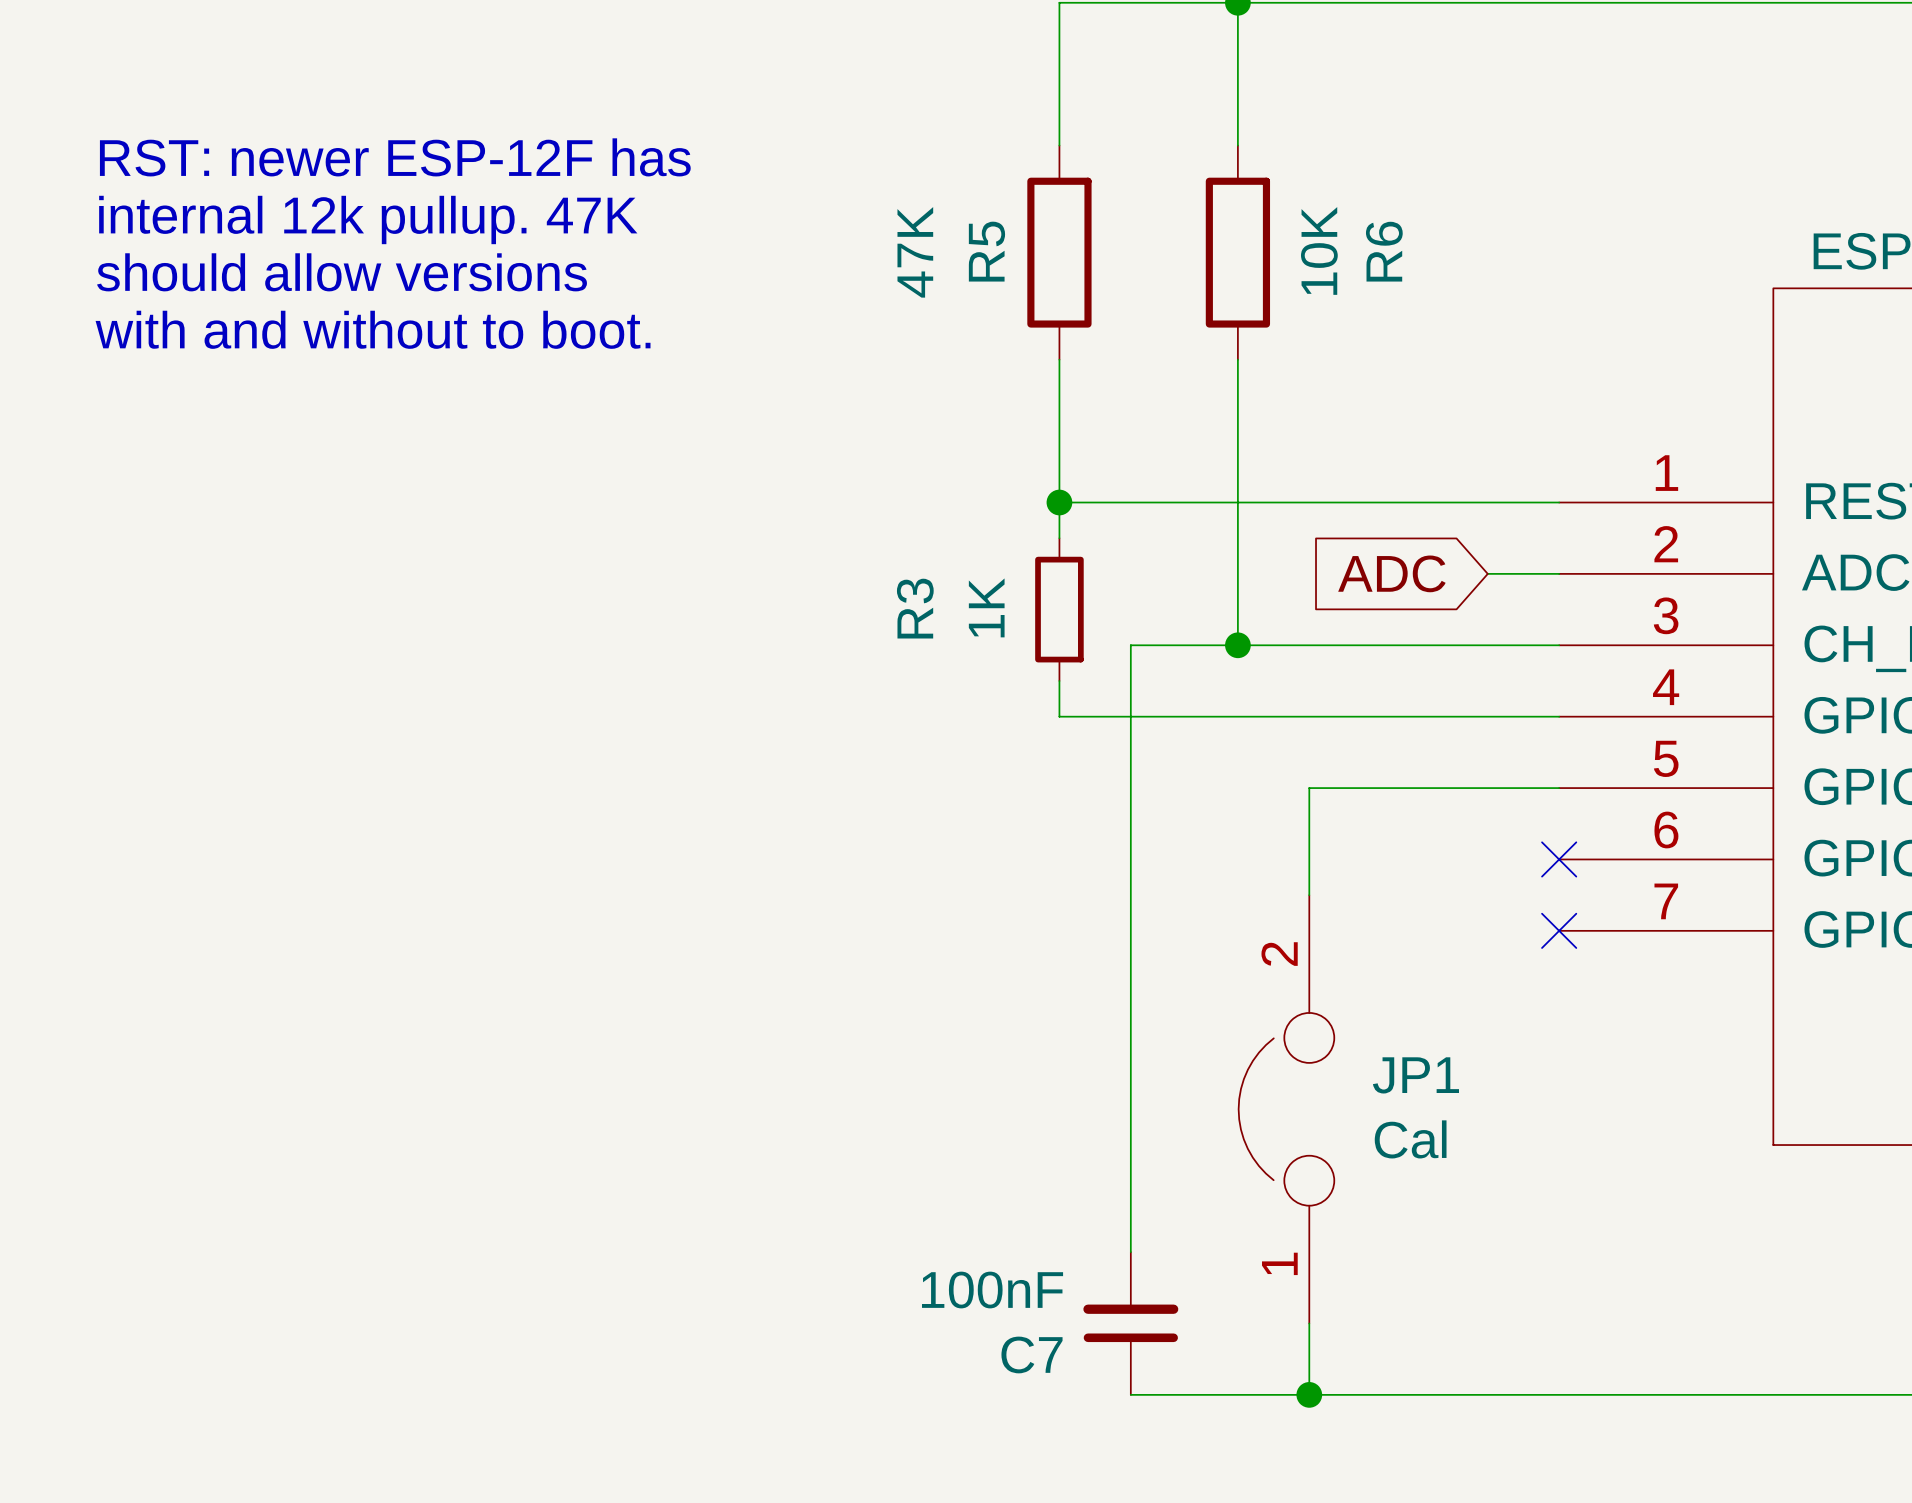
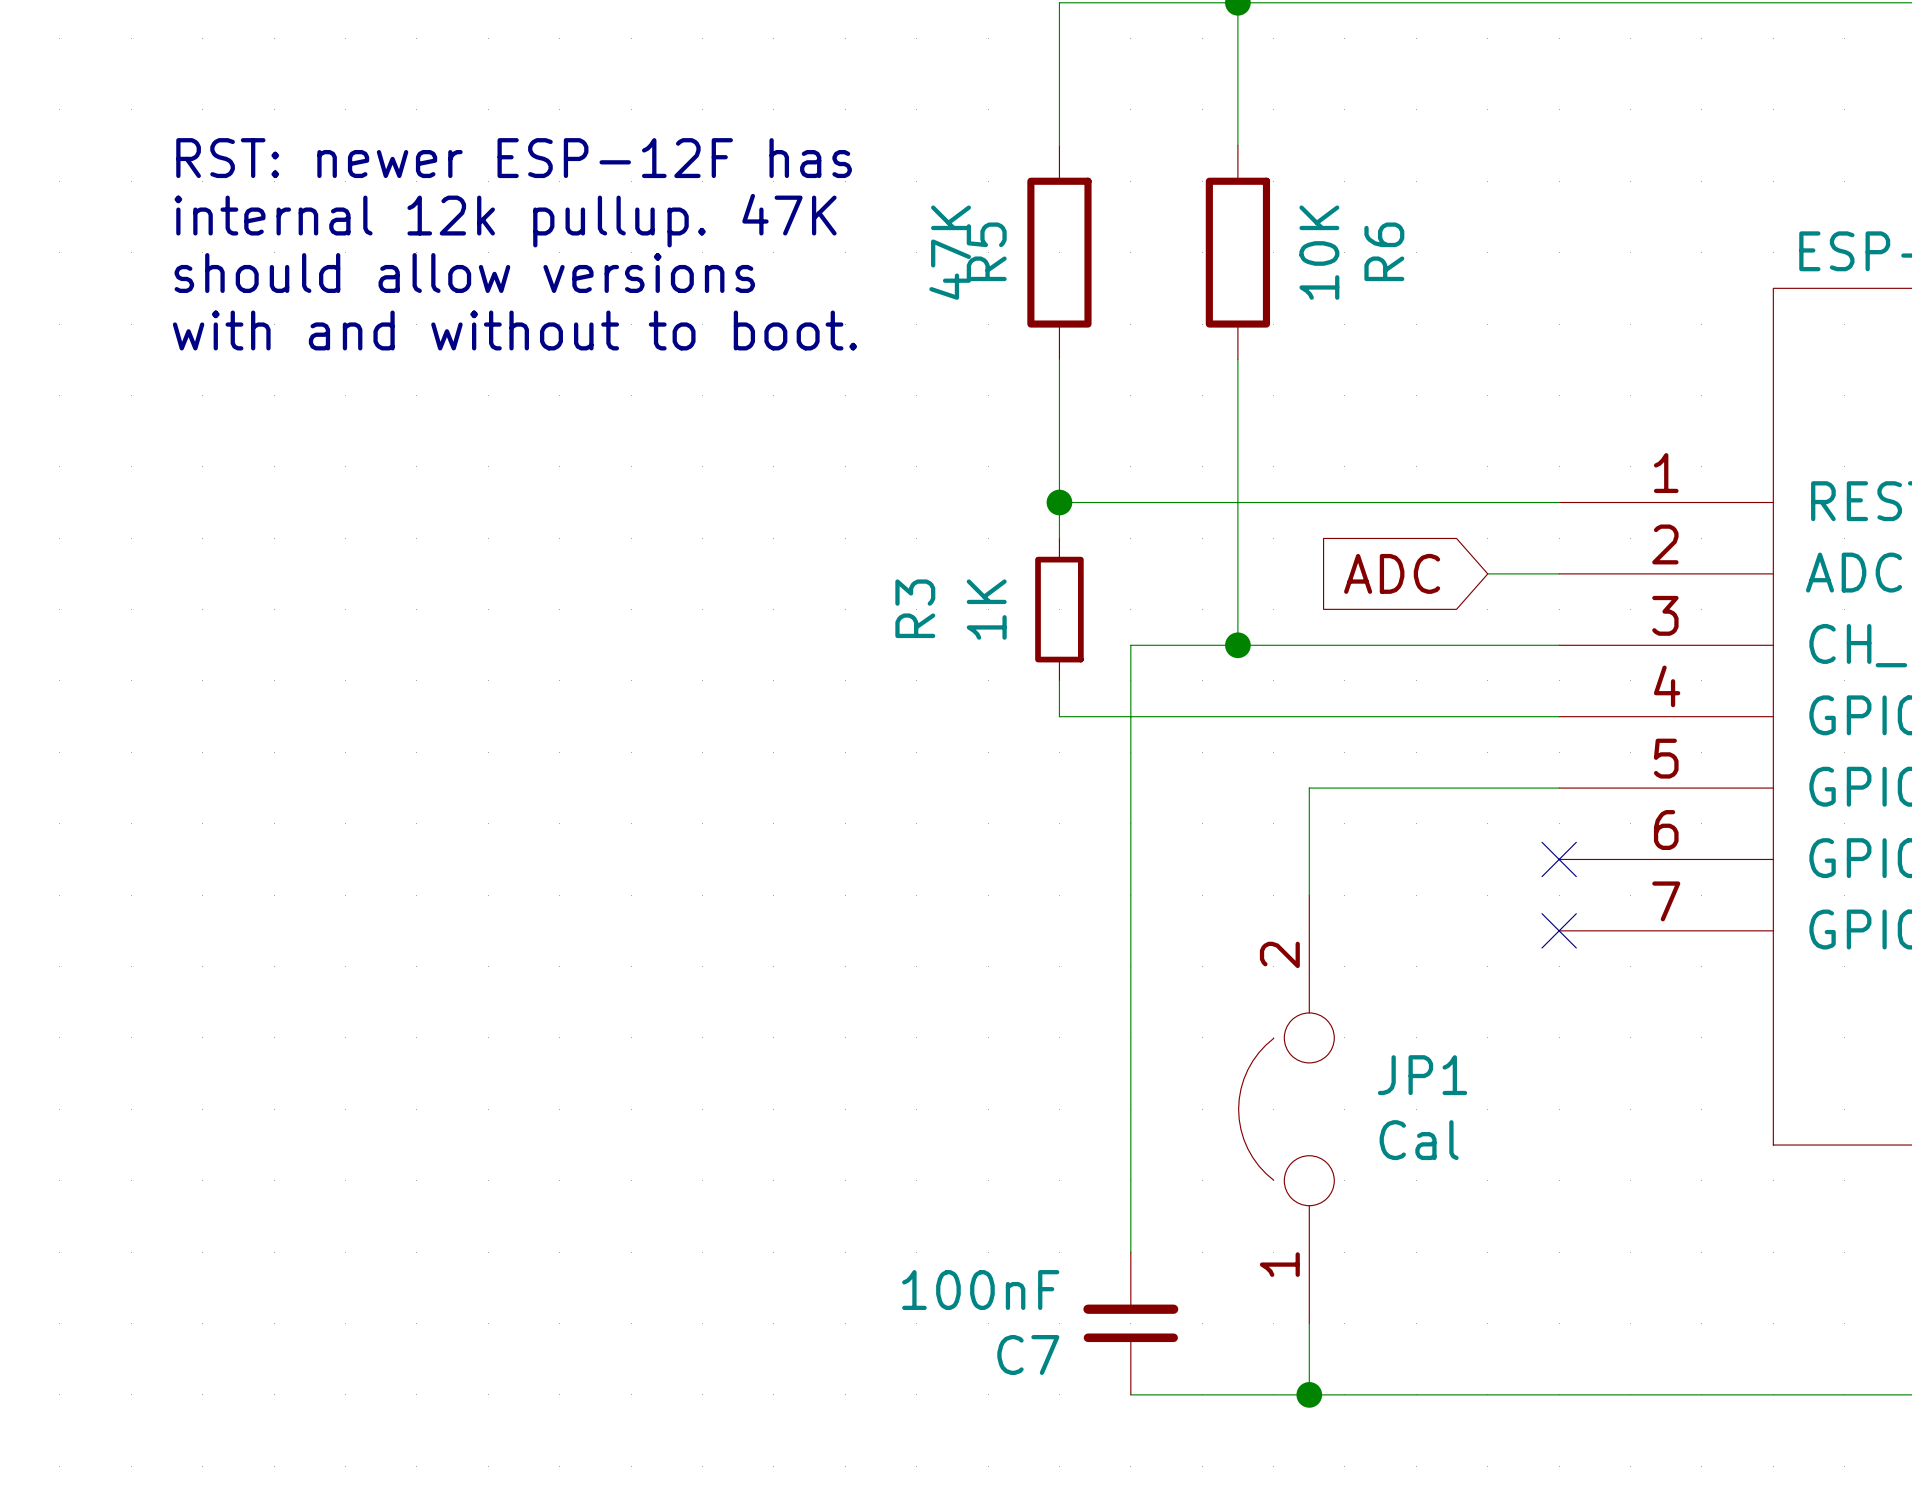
text position: RST: newer ESP-12F has (395, 157) -> RST: newer ESP-12F has (514, 158)
text position: internal 12k pullup. 47K (368, 219) -> internal 12k pullup. 47K (505, 220)
R5 value position: 47K (915, 252) -> 47K (950, 252)
text position: should allow versions (342, 272) -> should allow versions (464, 273)
text position: with and without to boot. (373, 329) -> with and without to boot. (514, 330)

